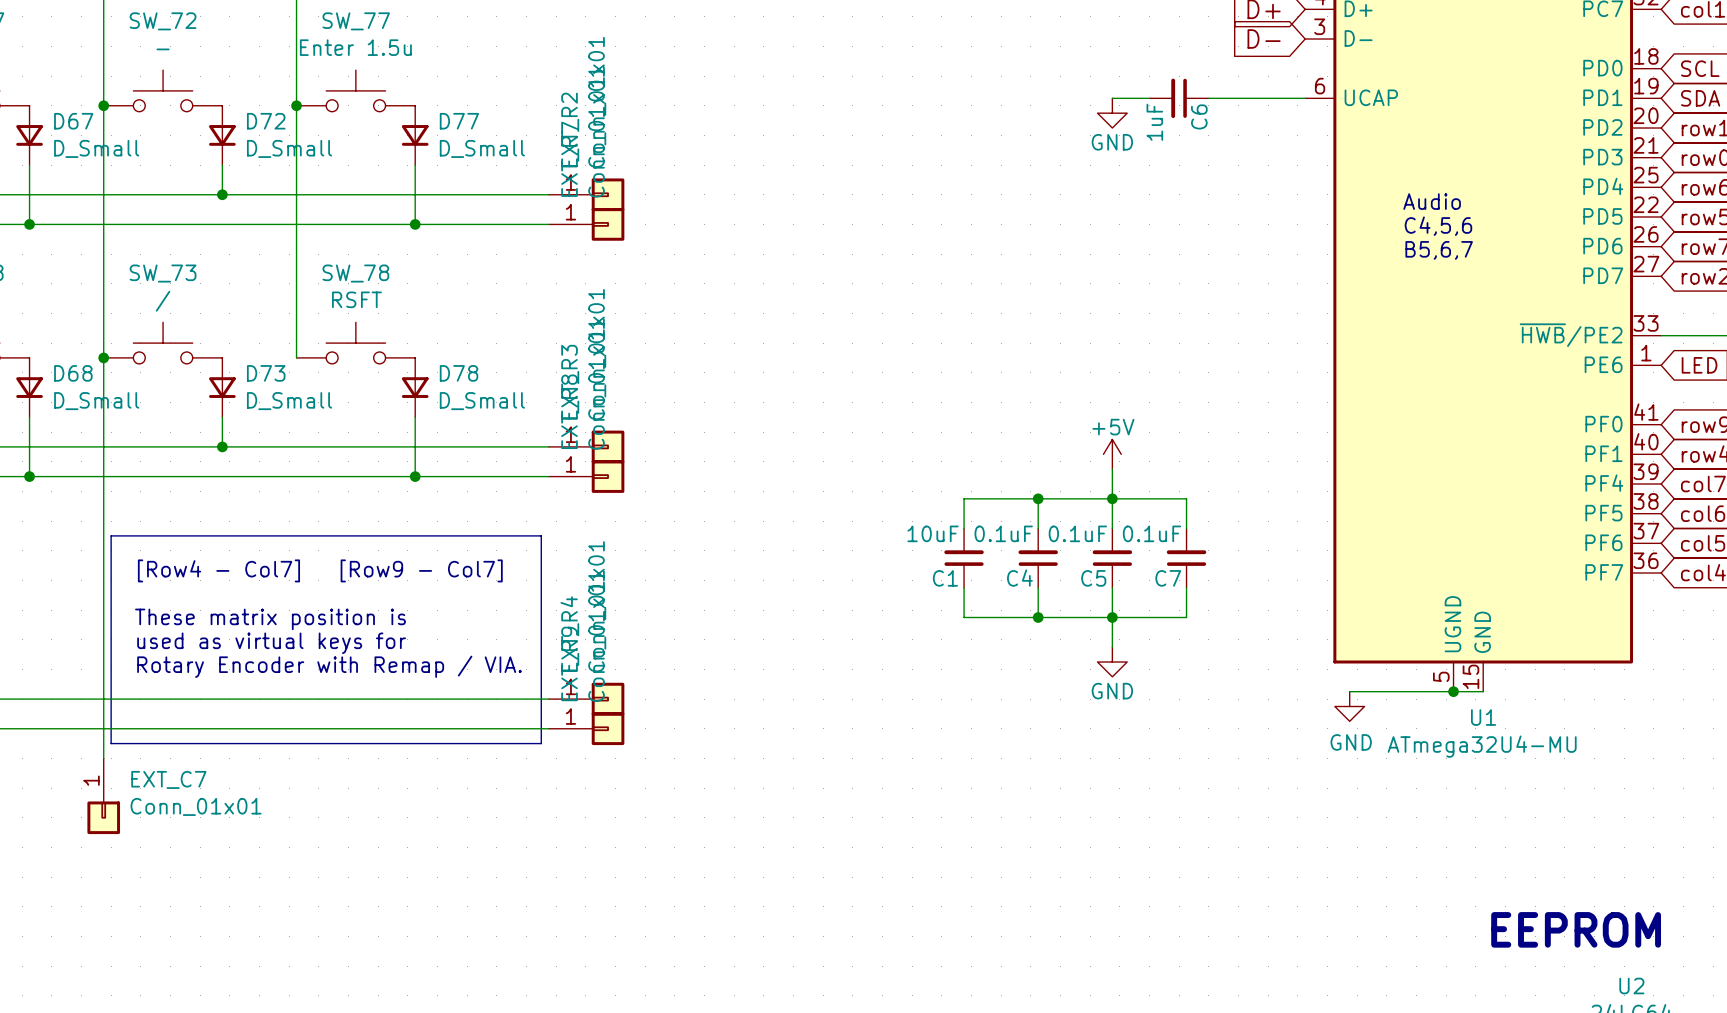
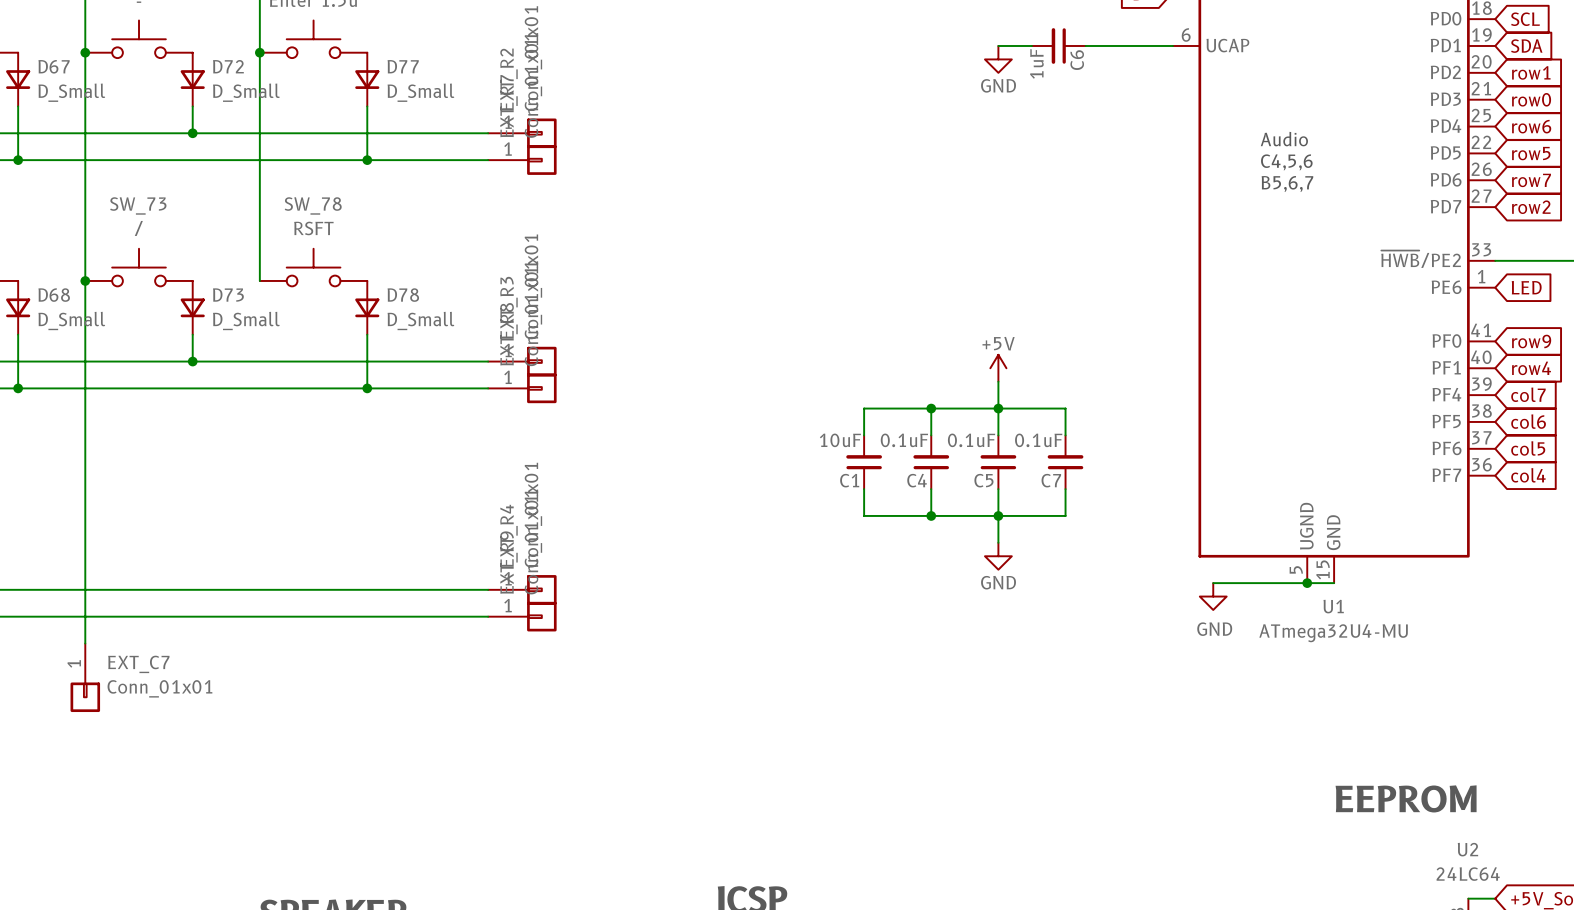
line: (111, 535) (111, 743) (541, 743) (541, 535) (111, 535) -> none
text: [Row4 - Col7] [Row9 - Col7] (320, 570) -> none
text: These matrix position is (270, 619) -> none
text: used as virtual keys for (271, 643) -> none
text: Rotary Encoder with Remap / VIA. (329, 666) -> none

